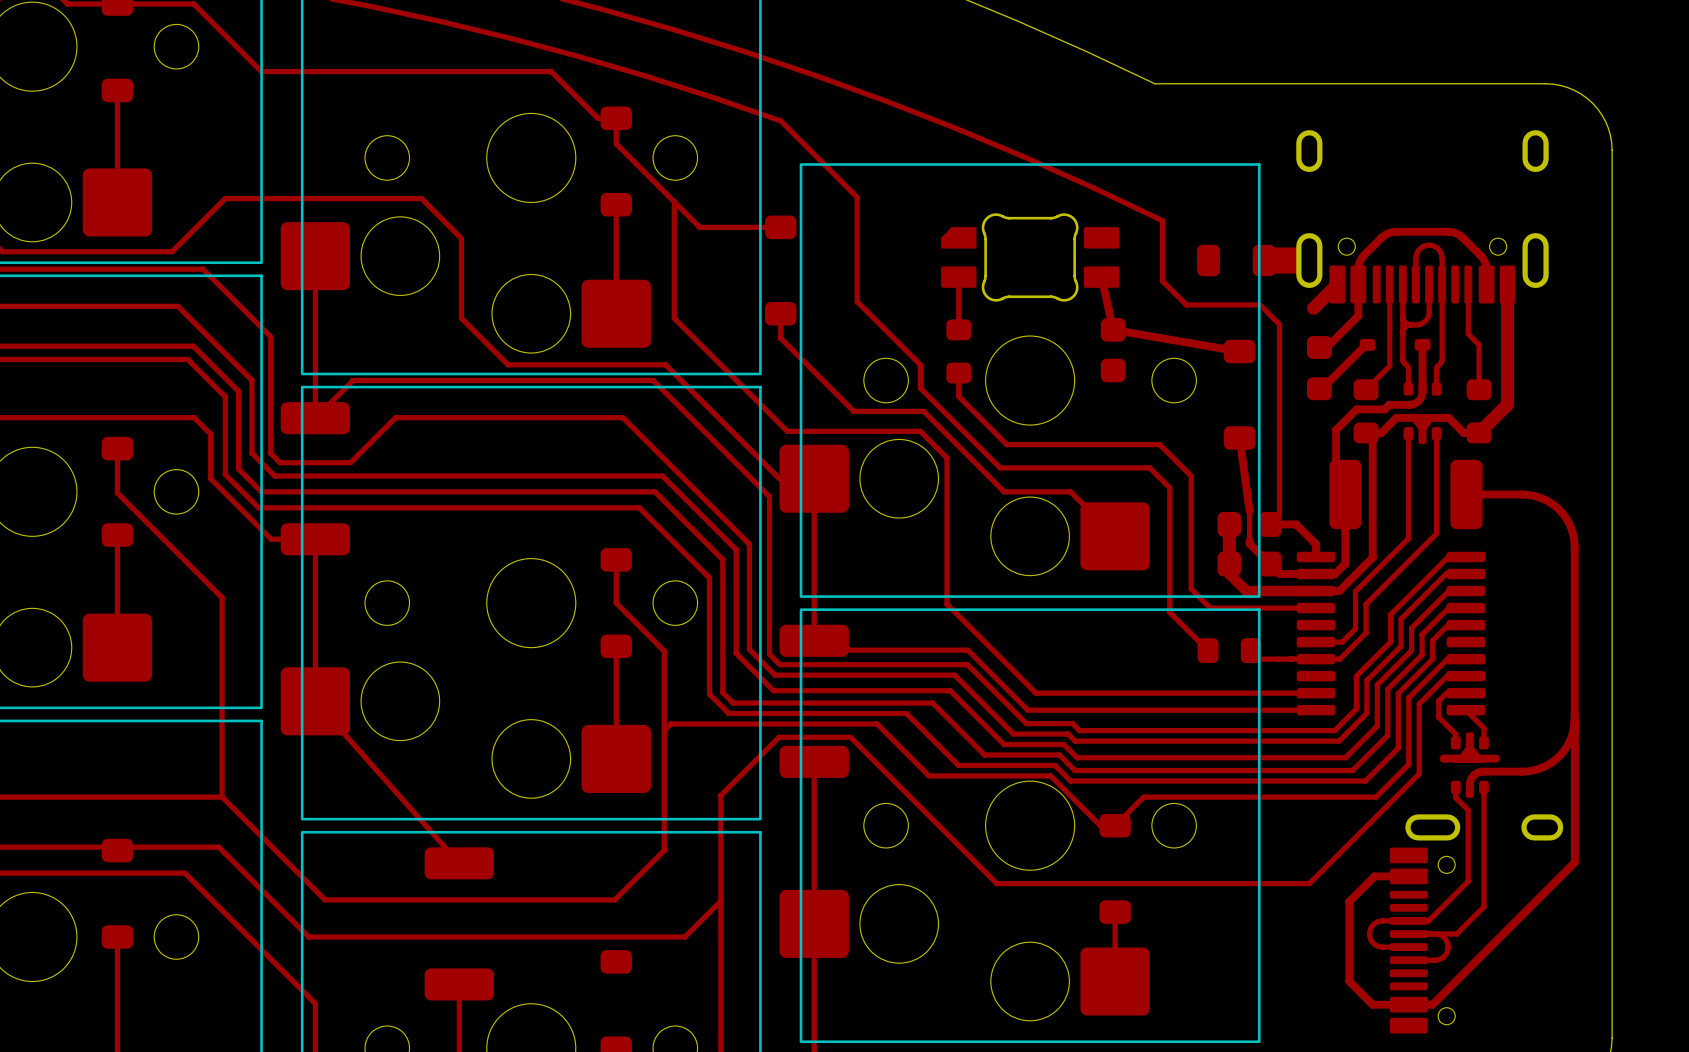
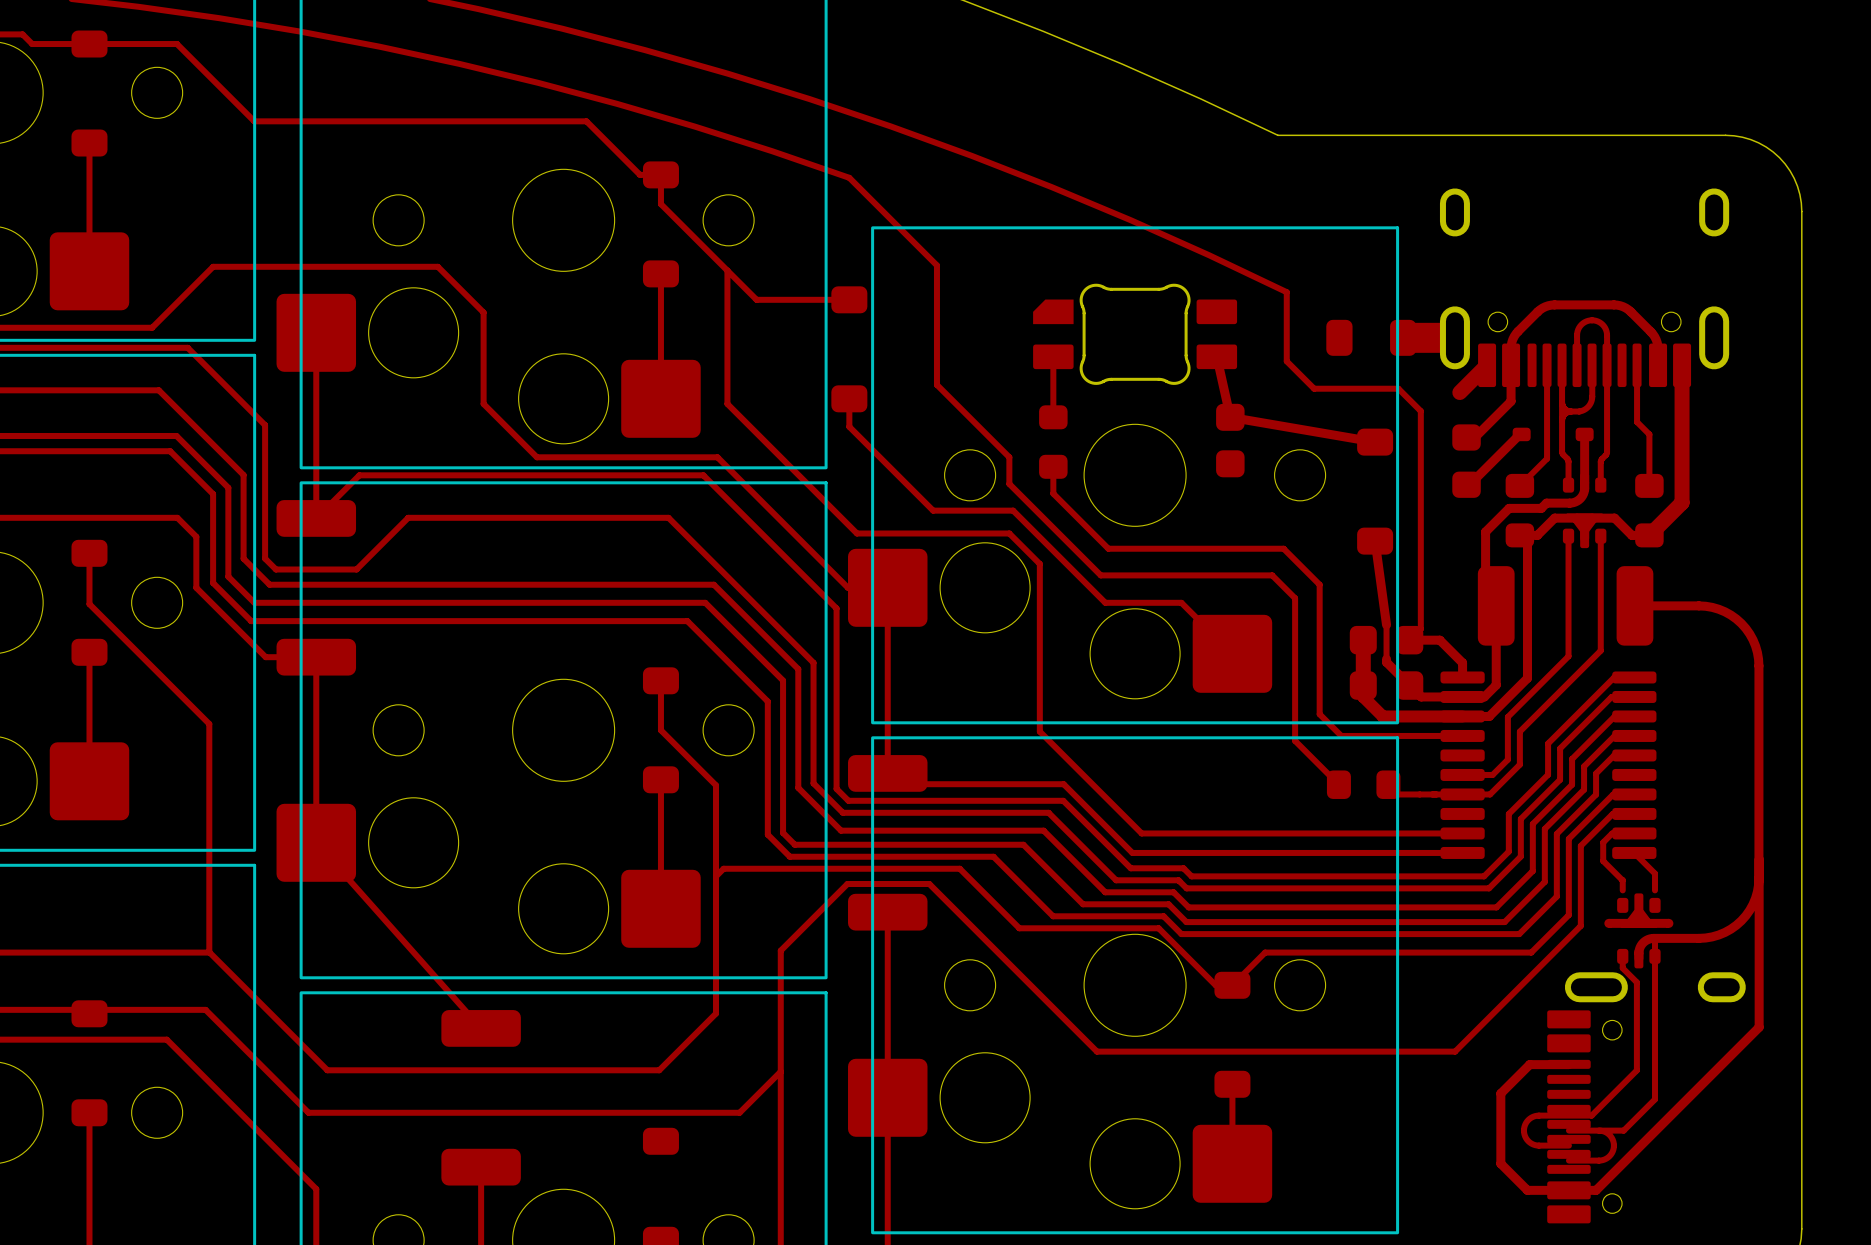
top track: (1574, 719) (1569, 742) (1559, 756) (1550, 763) (1528, 771) (1479, 772) (1471, 778) (1469, 789) -> (1758, 878) (1757, 891) (1753, 904) (1741, 920) (1730, 929) (1718, 935) (1705, 938) (1649, 938) (1640, 945) (1638, 958)
part position: (1469, 765) -> (1638, 930)
top track: (1455, 787) (1455, 797) (1468, 810) (1468, 823) -> (1622, 956) (1622, 968) (1636, 982)
top track: (1408, 876) (1374, 876) (1349, 901) (1349, 920) -> (1568, 1064) (1529, 1064) (1500, 1093)
top track: (1468, 881) (1428, 920) (1380, 921) (1371, 927) (1370, 937) (1376, 945) (1408, 947) -> (1636, 1049) (1636, 1070) (1591, 1115) (1537, 1115) (1531, 1117) (1525, 1123) (1524, 1134) (1531, 1143) (1538, 1145) (1568, 1145)
top track: (1483, 906) (1456, 934) (1408, 934) -> (1654, 1078) (1654, 1099) (1623, 1130) (1568, 1130)
top track: (1435, 934) (1443, 936) (1447, 942) (1448, 948) (1444, 956) (1436, 960) (1408, 960) -> (1598, 1130) (1606, 1132) (1612, 1139) (1613, 1147) (1609, 1156) (1600, 1160) (1568, 1160)

